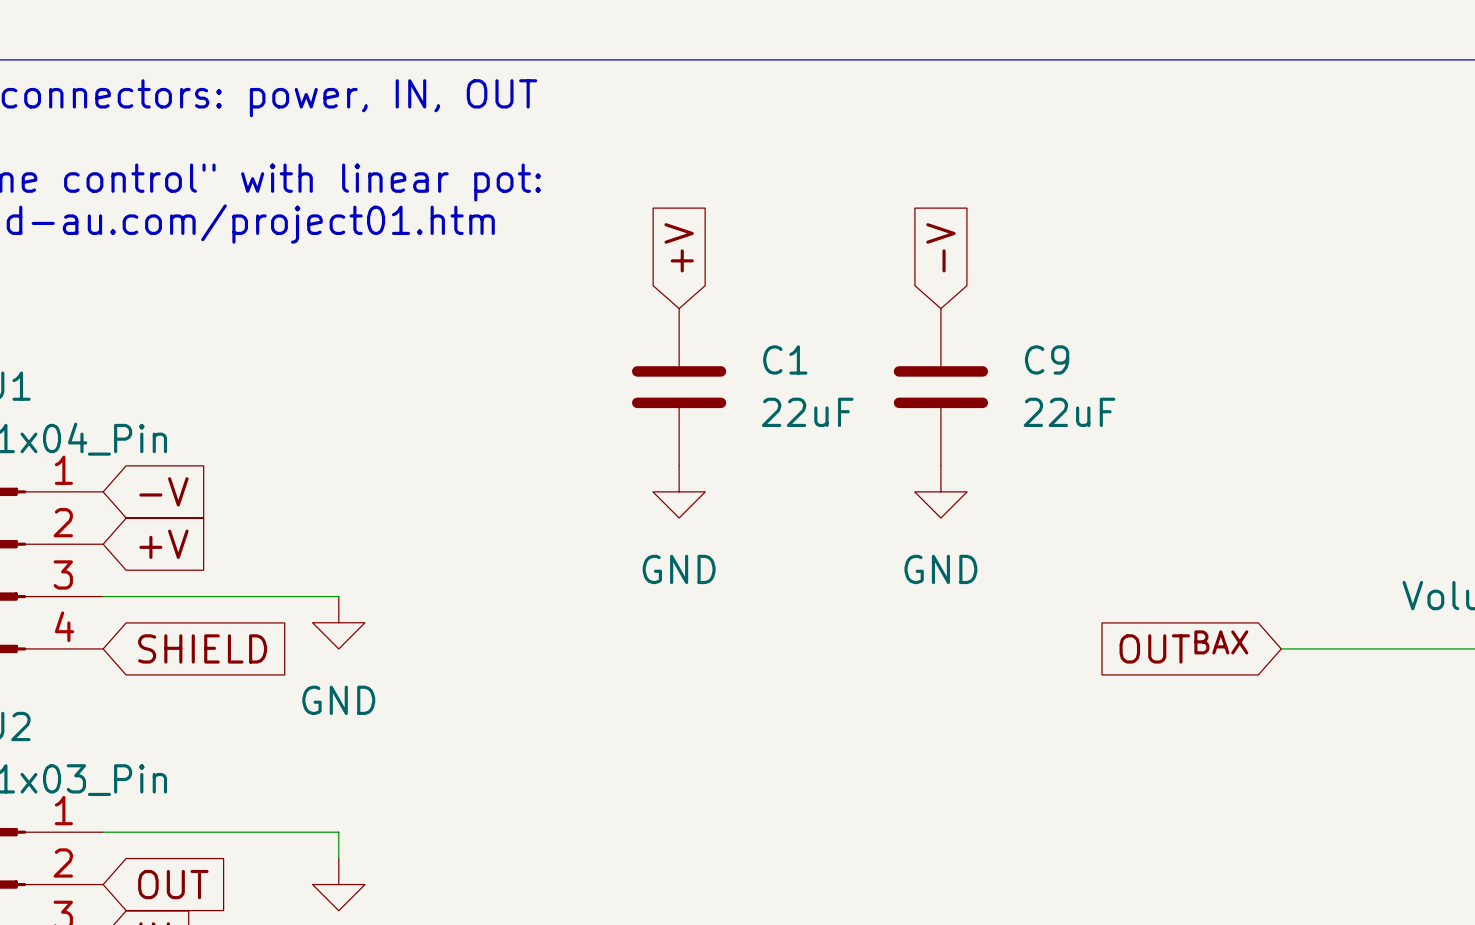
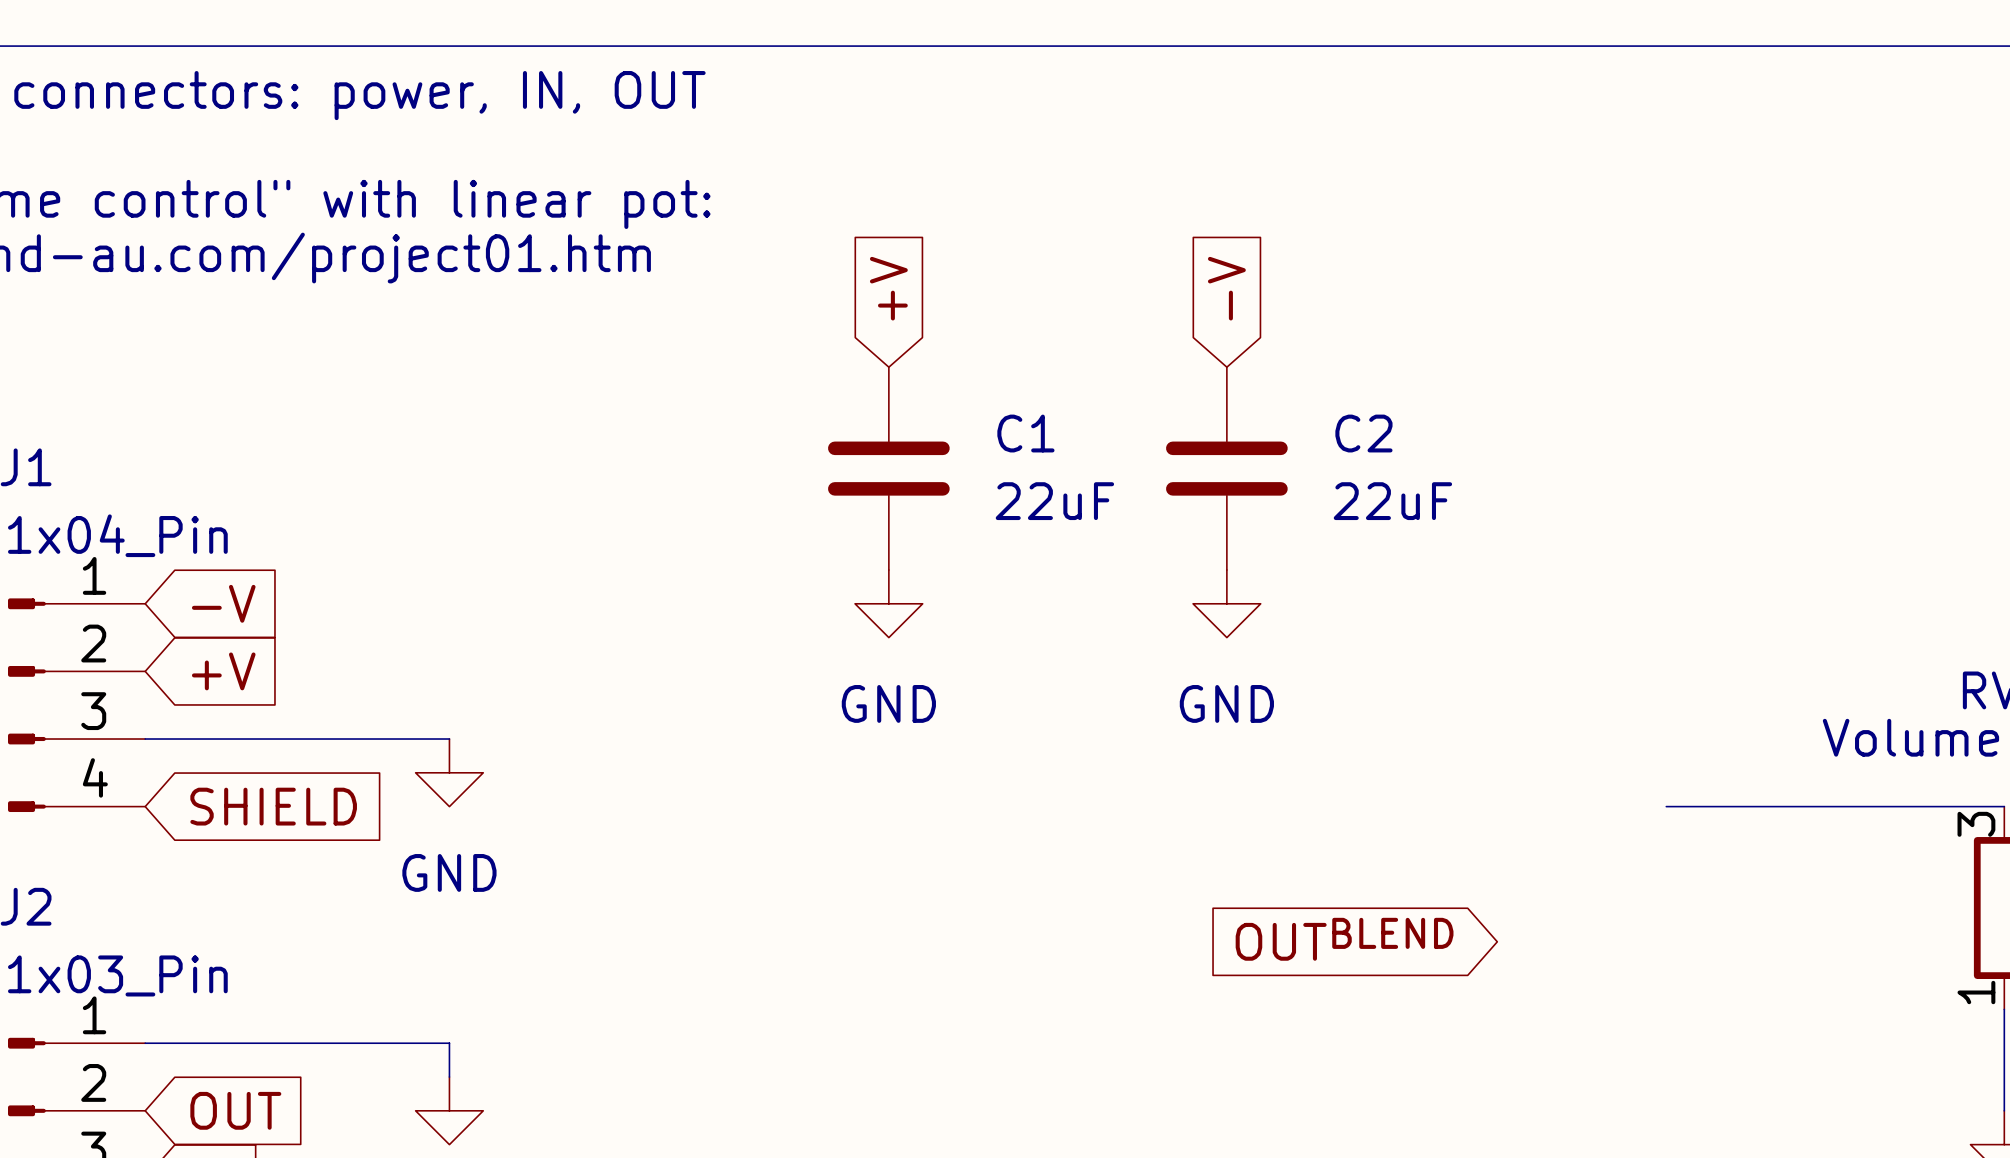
C9 name: C9 (1047, 359) -> C2 (1363, 433)
global label: OUTBAX (1183, 646) -> none
global label: none -> OUTBLEND (1344, 939)

